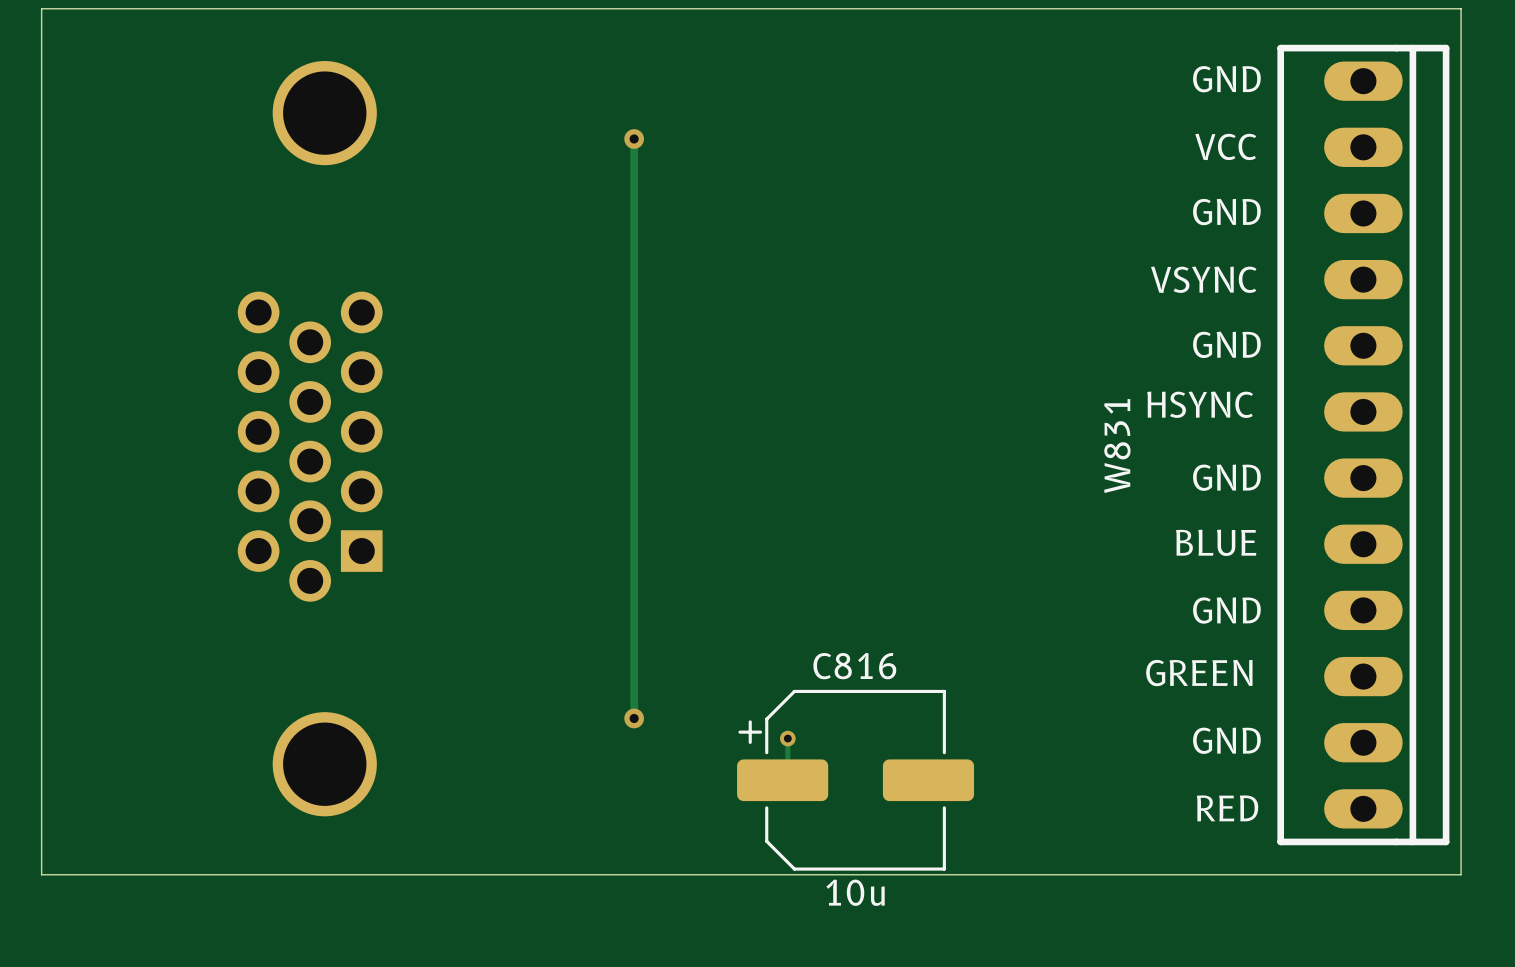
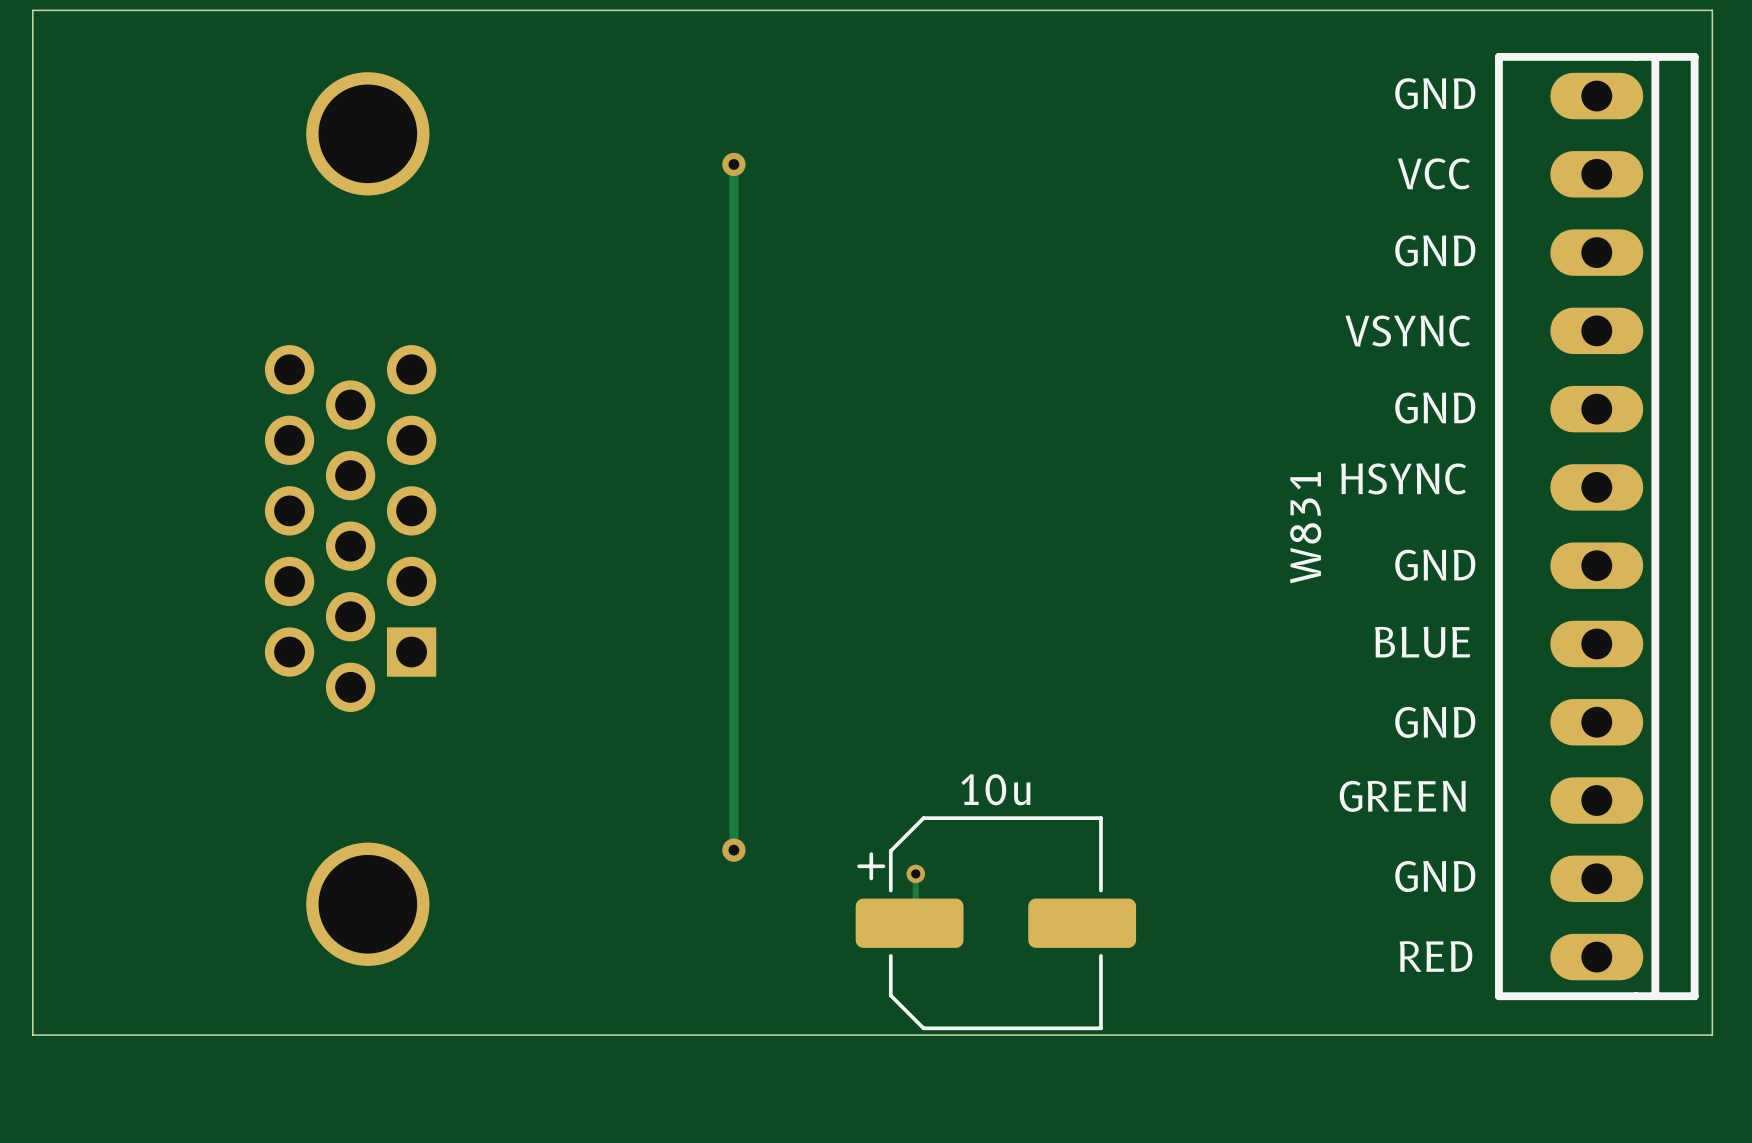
C816 name: C816 (854, 666) -> none
C816 value position: 10u (855, 892) -> 10u (995, 789)

